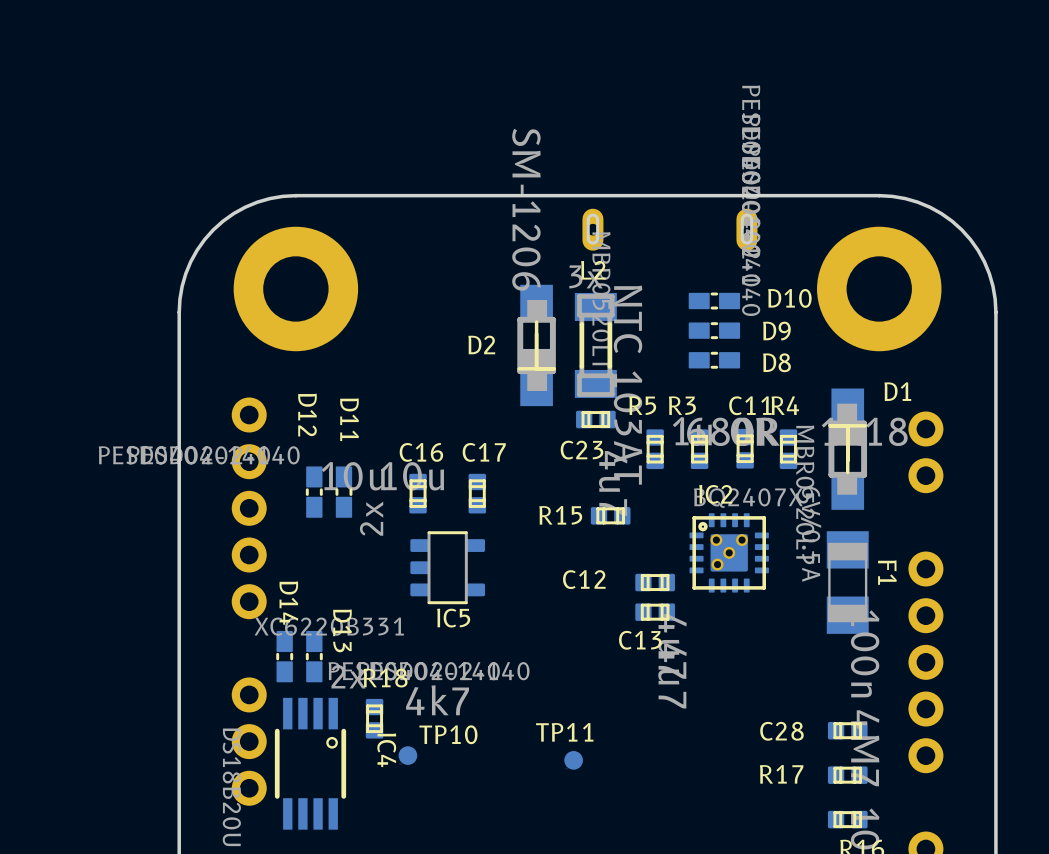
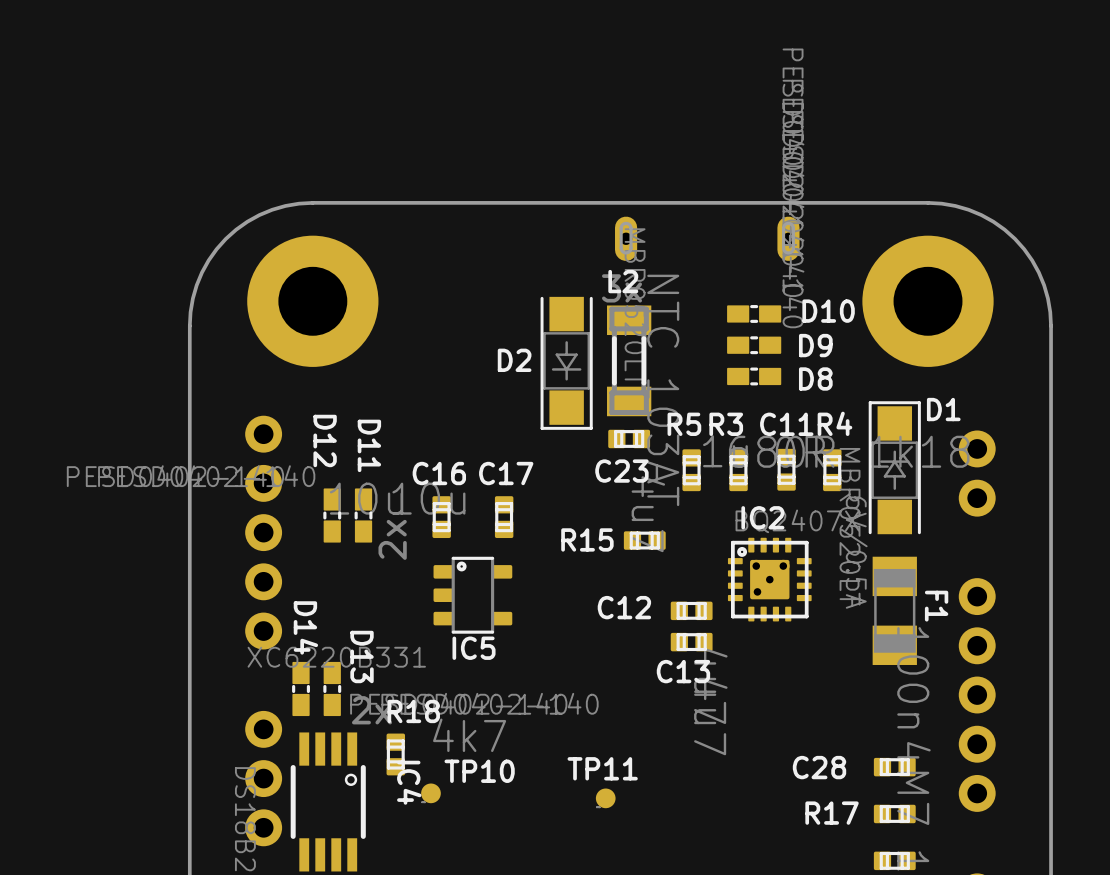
L2 value: SM-1206 (526, 209) -> none
D2 footprint: [517, 284, 556, 407] -> [540, 296, 593, 430]
D1 footprint: [828, 388, 868, 510] -> [868, 401, 921, 535]
IC5 footprint: [410, 531, 486, 605] -> [433, 556, 513, 634]

